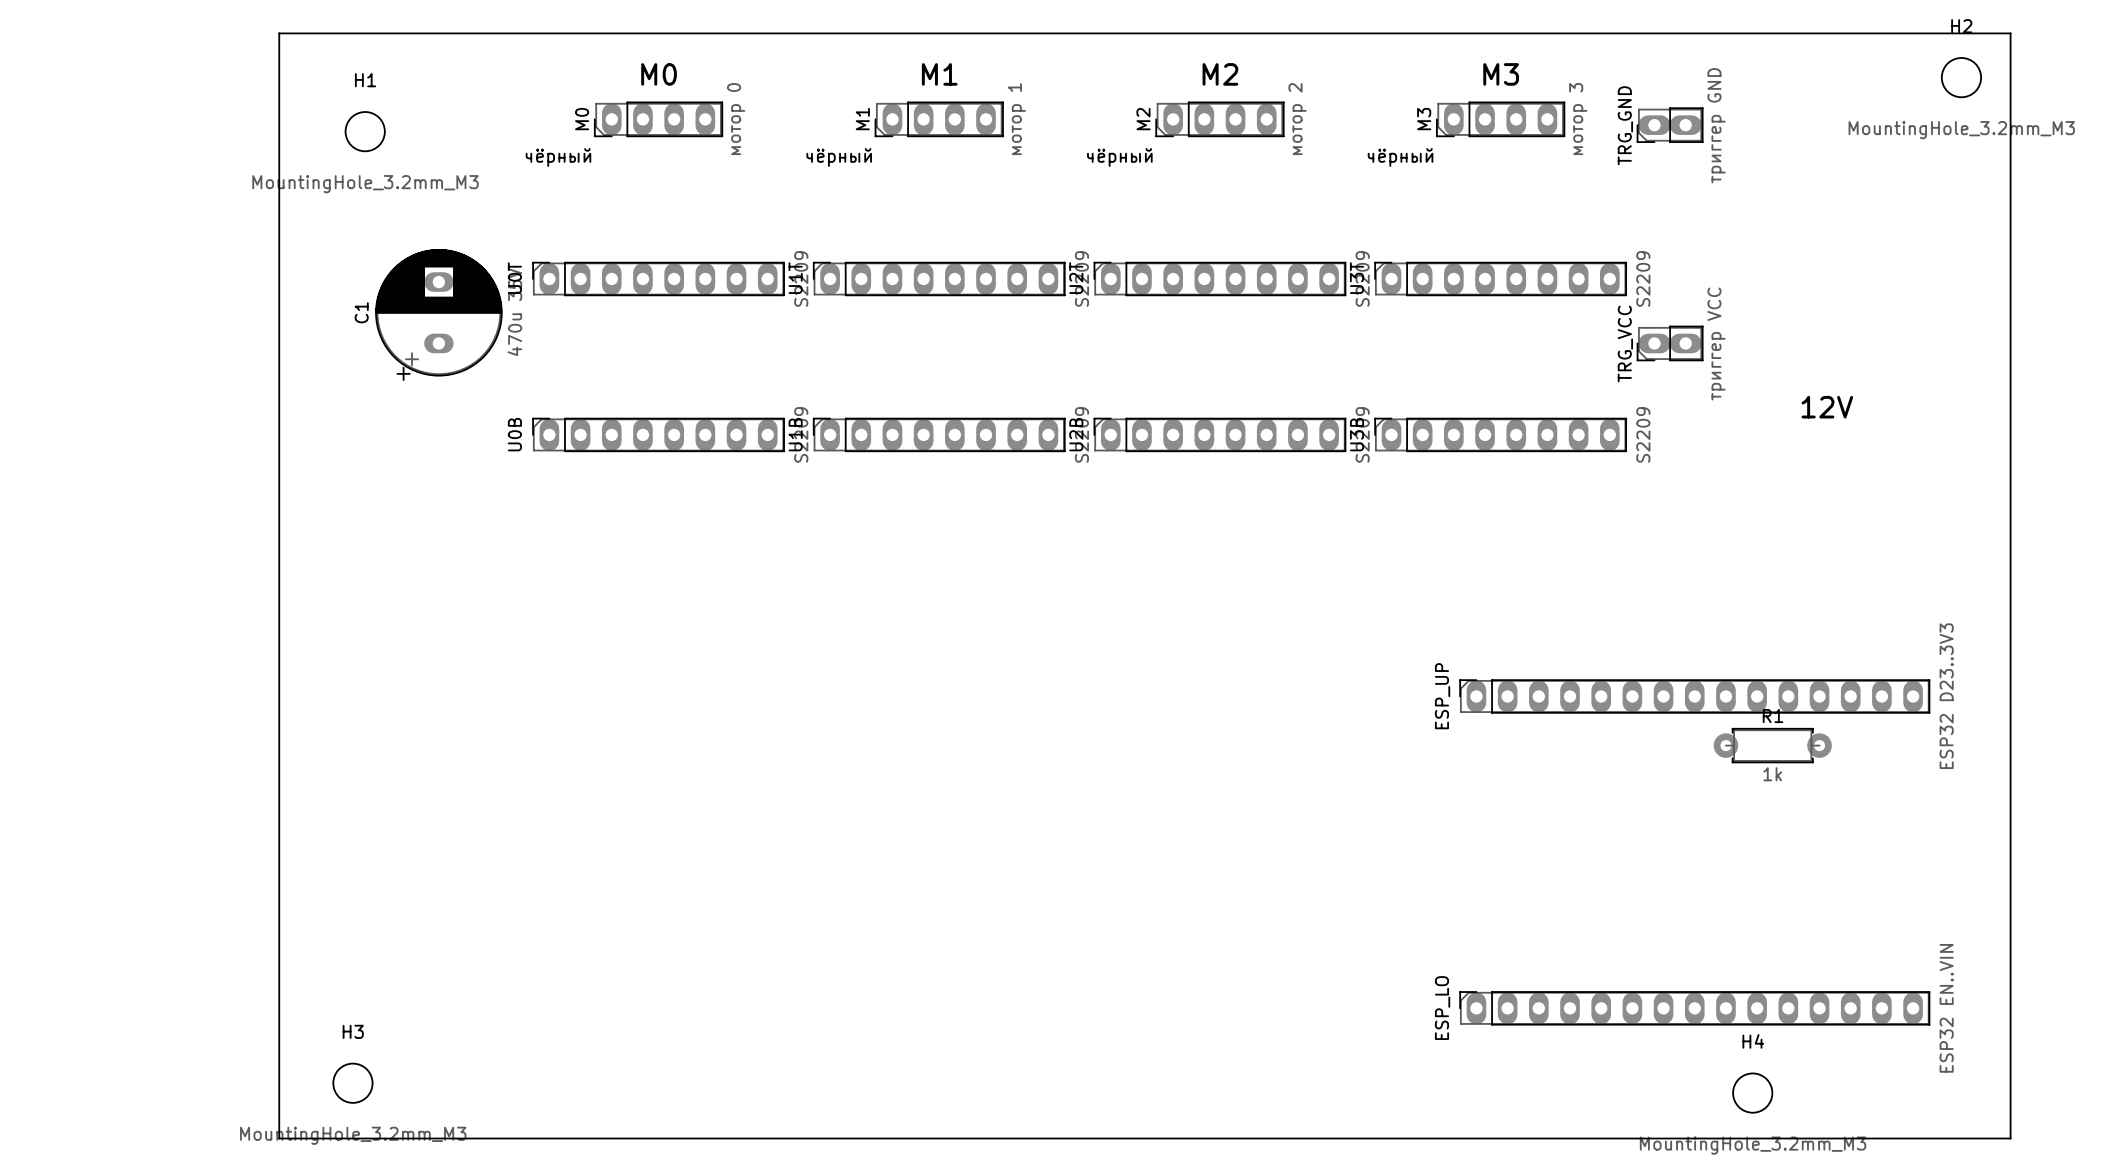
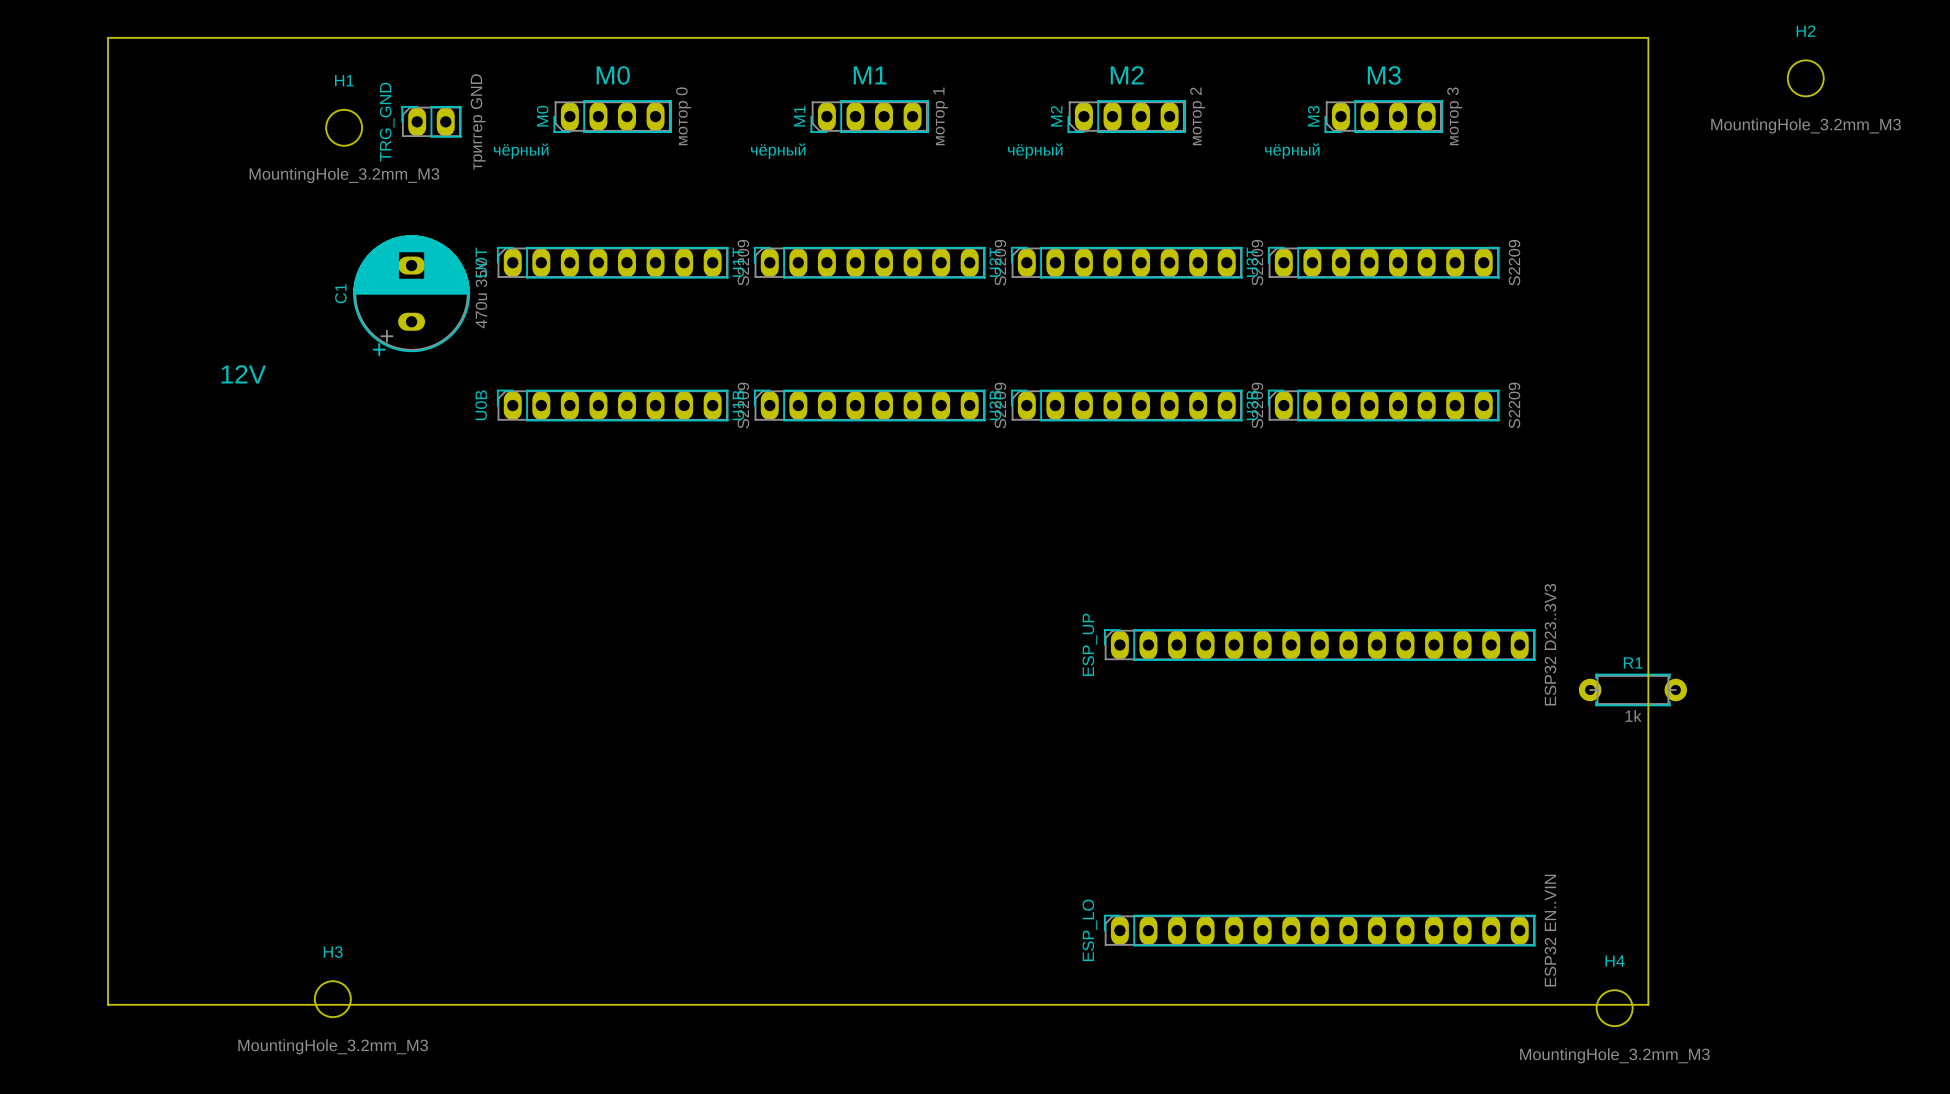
board edge: (279, 33) (279, 1138) (2010, 1138) (2010, 33) (1789, 33) -> (265, 37) (107, 37) (107, 1004) (1648, 1004) (1648, 37)
TRG_GND: none -> триггер GND (431, 121)
TRG_GND: триггер GND (1670, 125) -> none
TRG_VCC: триггер VCC (1670, 343) -> none
text: none -> 12V (243, 374)
text: 12V (1827, 407) -> none
ESP_UP position: (1694, 696) -> (1319, 645)
ESP_LO position: (1694, 1008) -> (1319, 930)

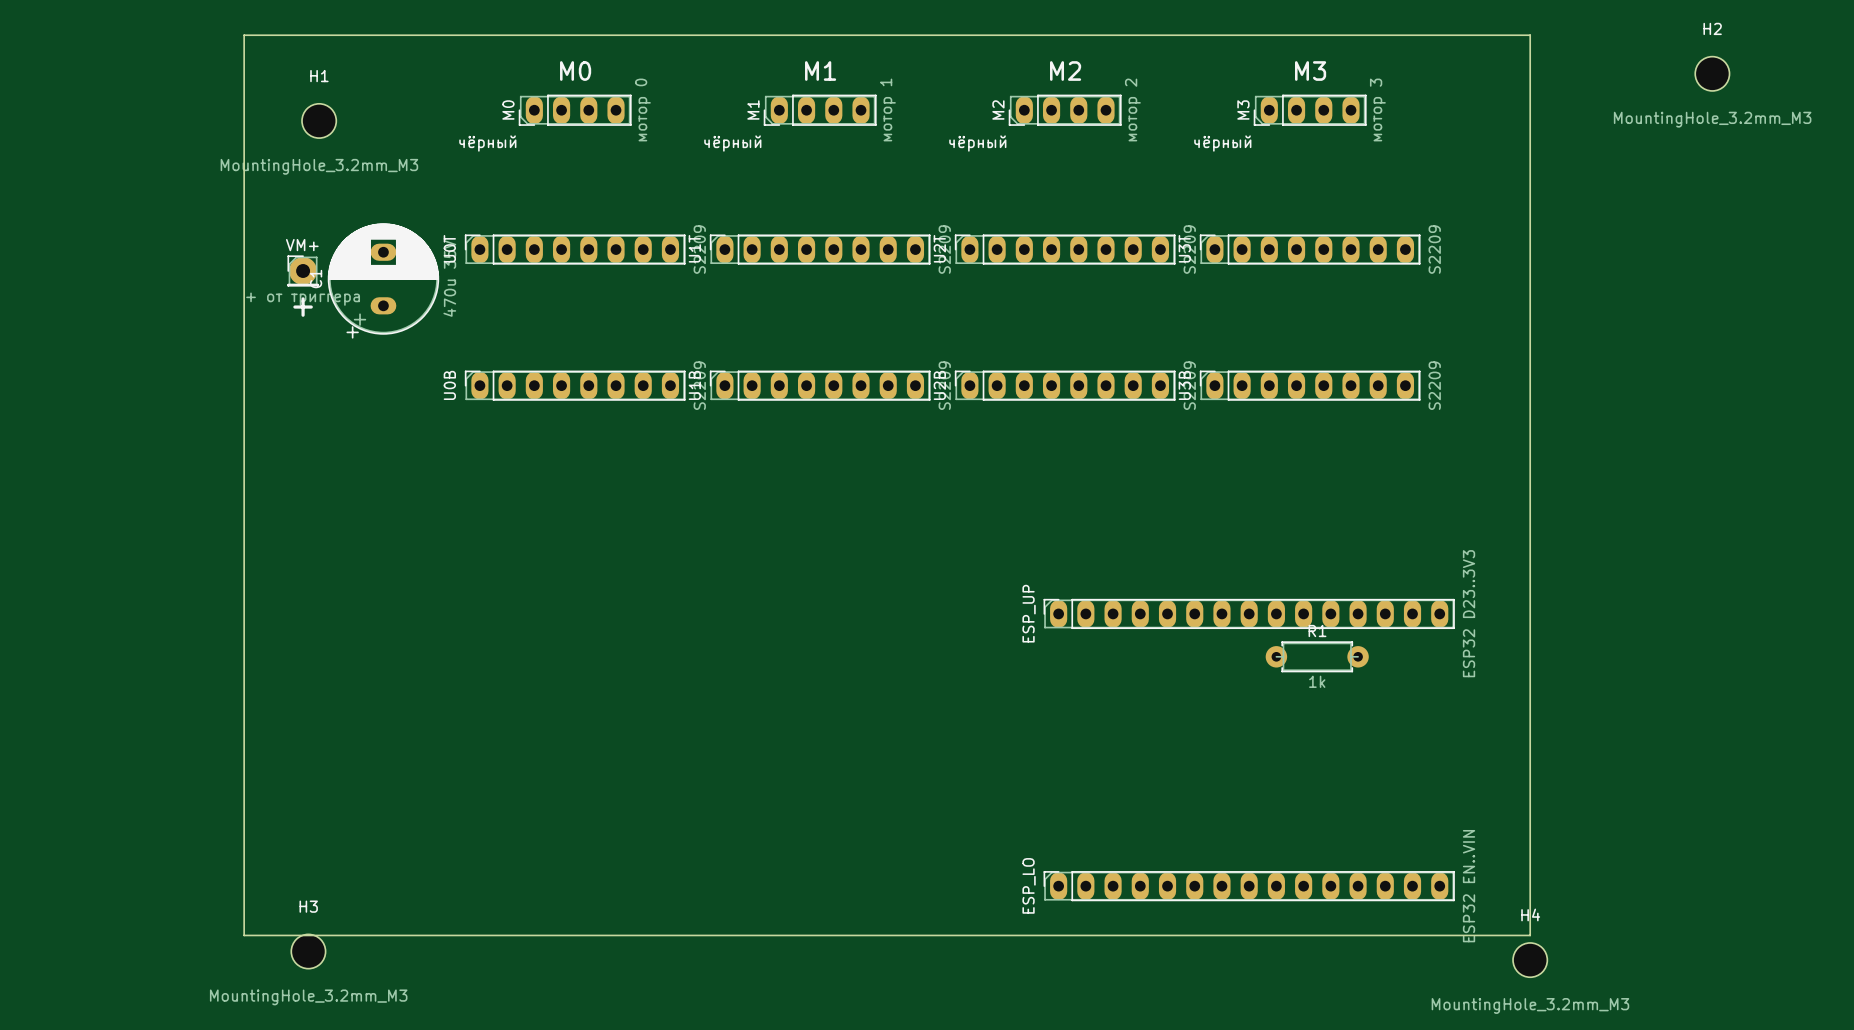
board edge: (265, 37) (107, 37) (107, 1004) (1648, 1004) (1648, 37) (1614, 37) -> (244, 35) (244, 935) (1530, 935) (1530, 35)
TRG_GND: триггер GND (431, 121) -> none
VM+: none -> + от триггера (303, 270)
text: none -> + (303, 307)
text: 12V (243, 374) -> none
R1 position: (1632, 689) -> (1317, 656)

